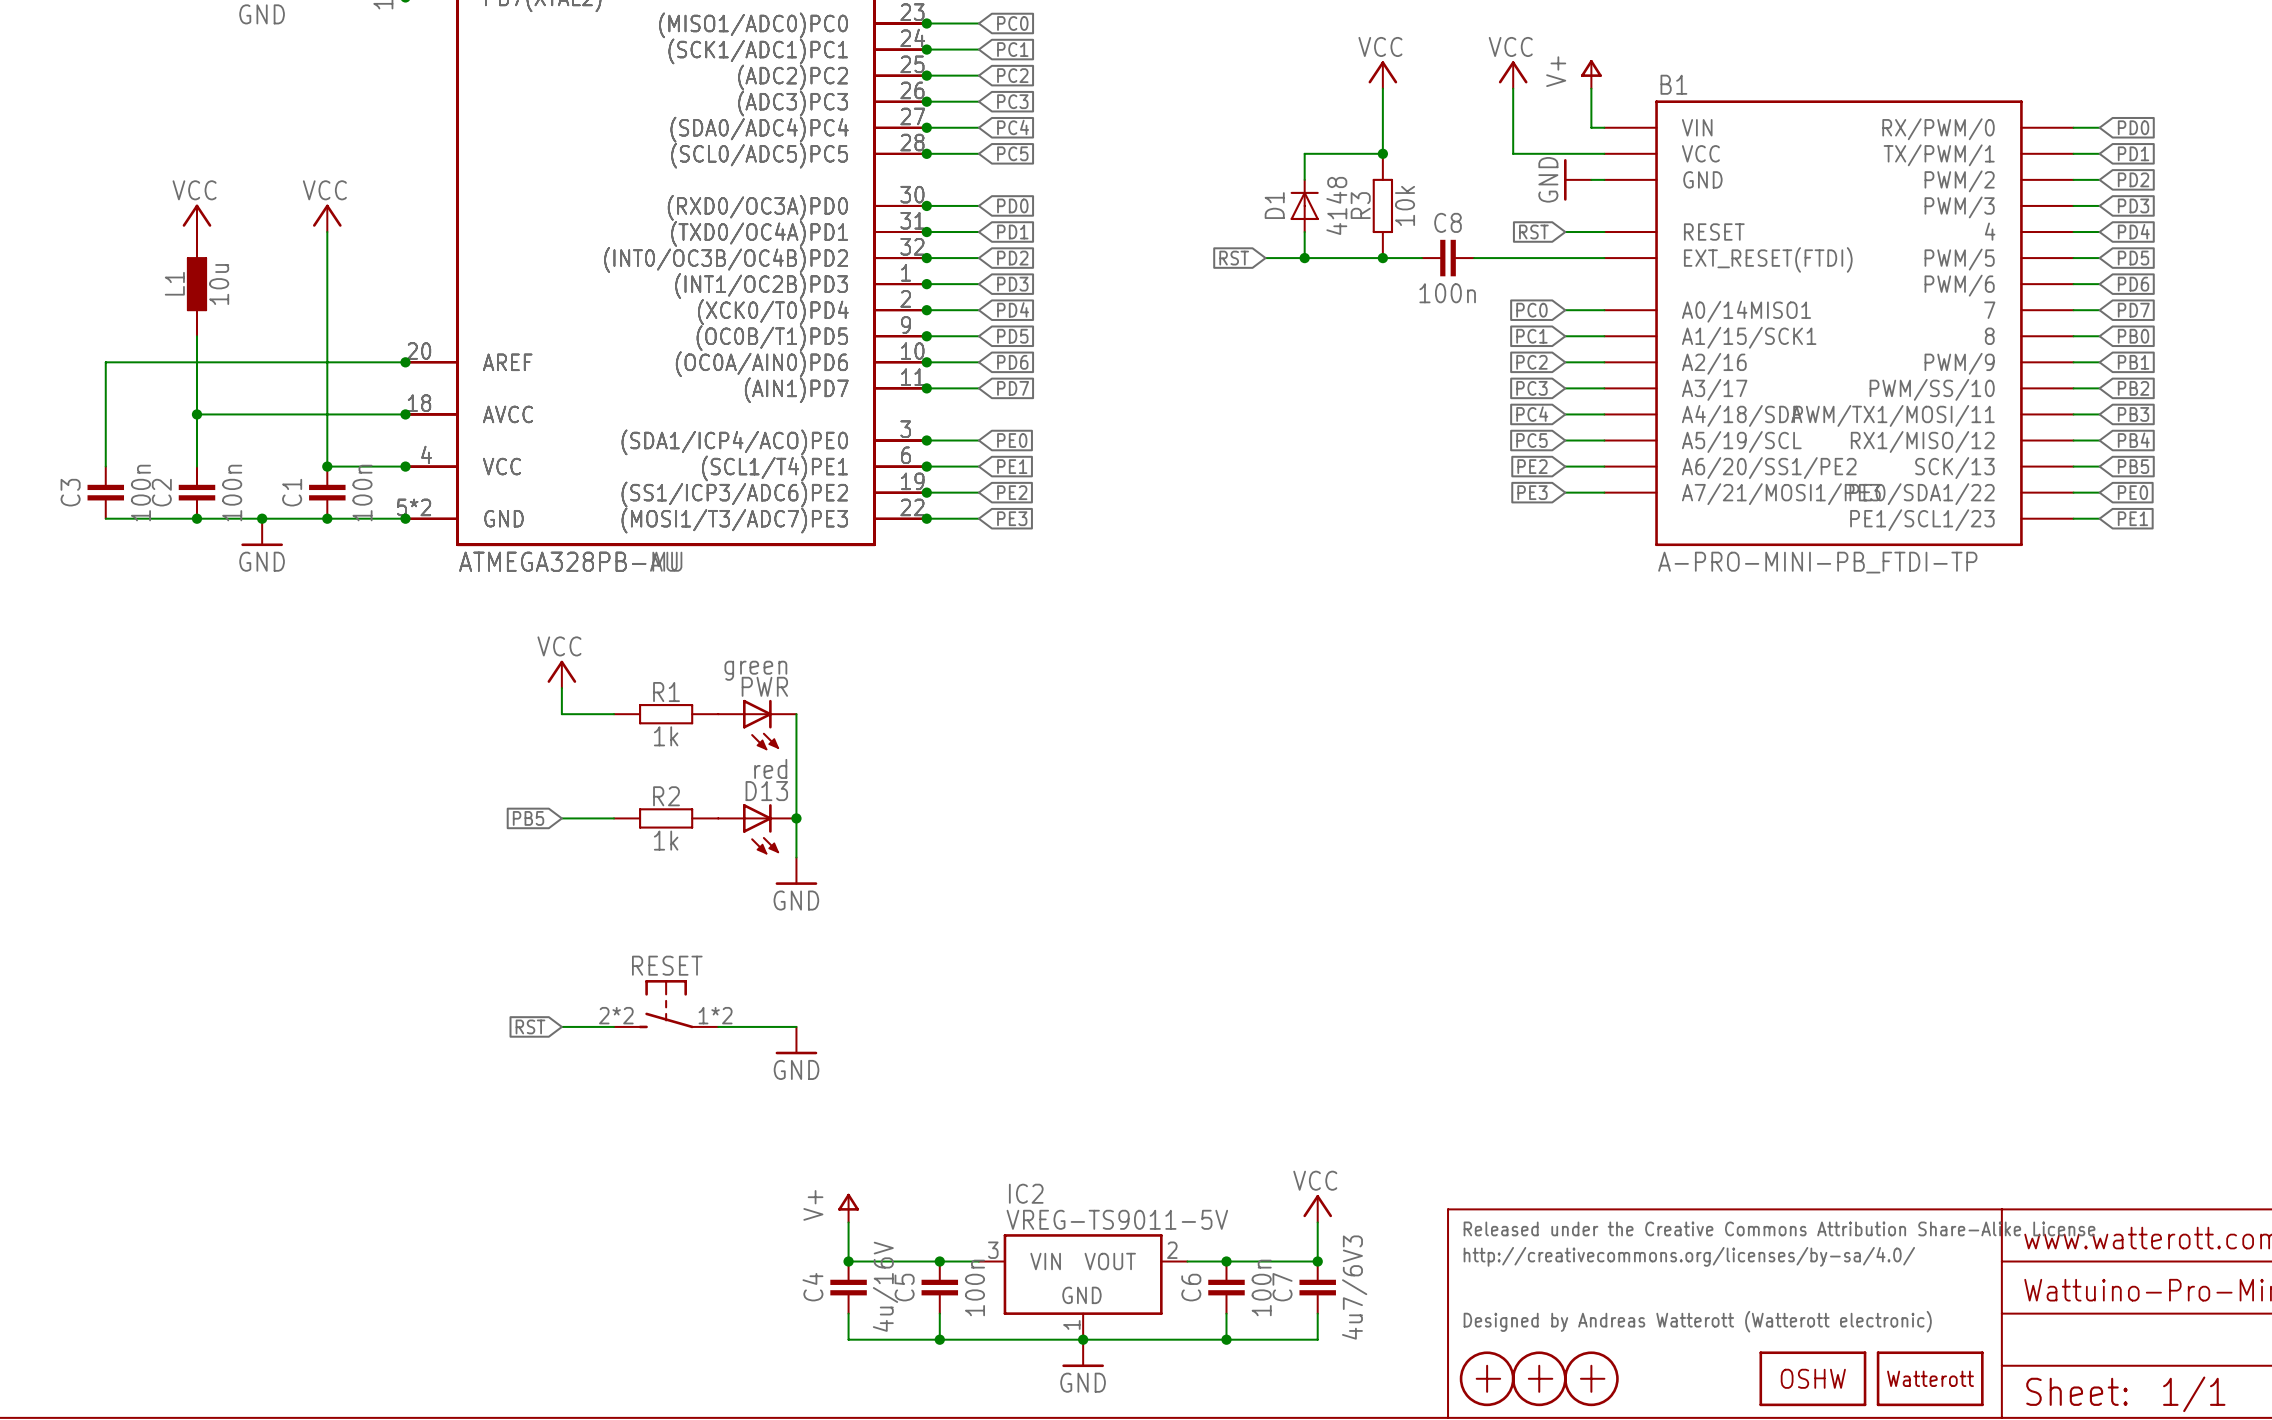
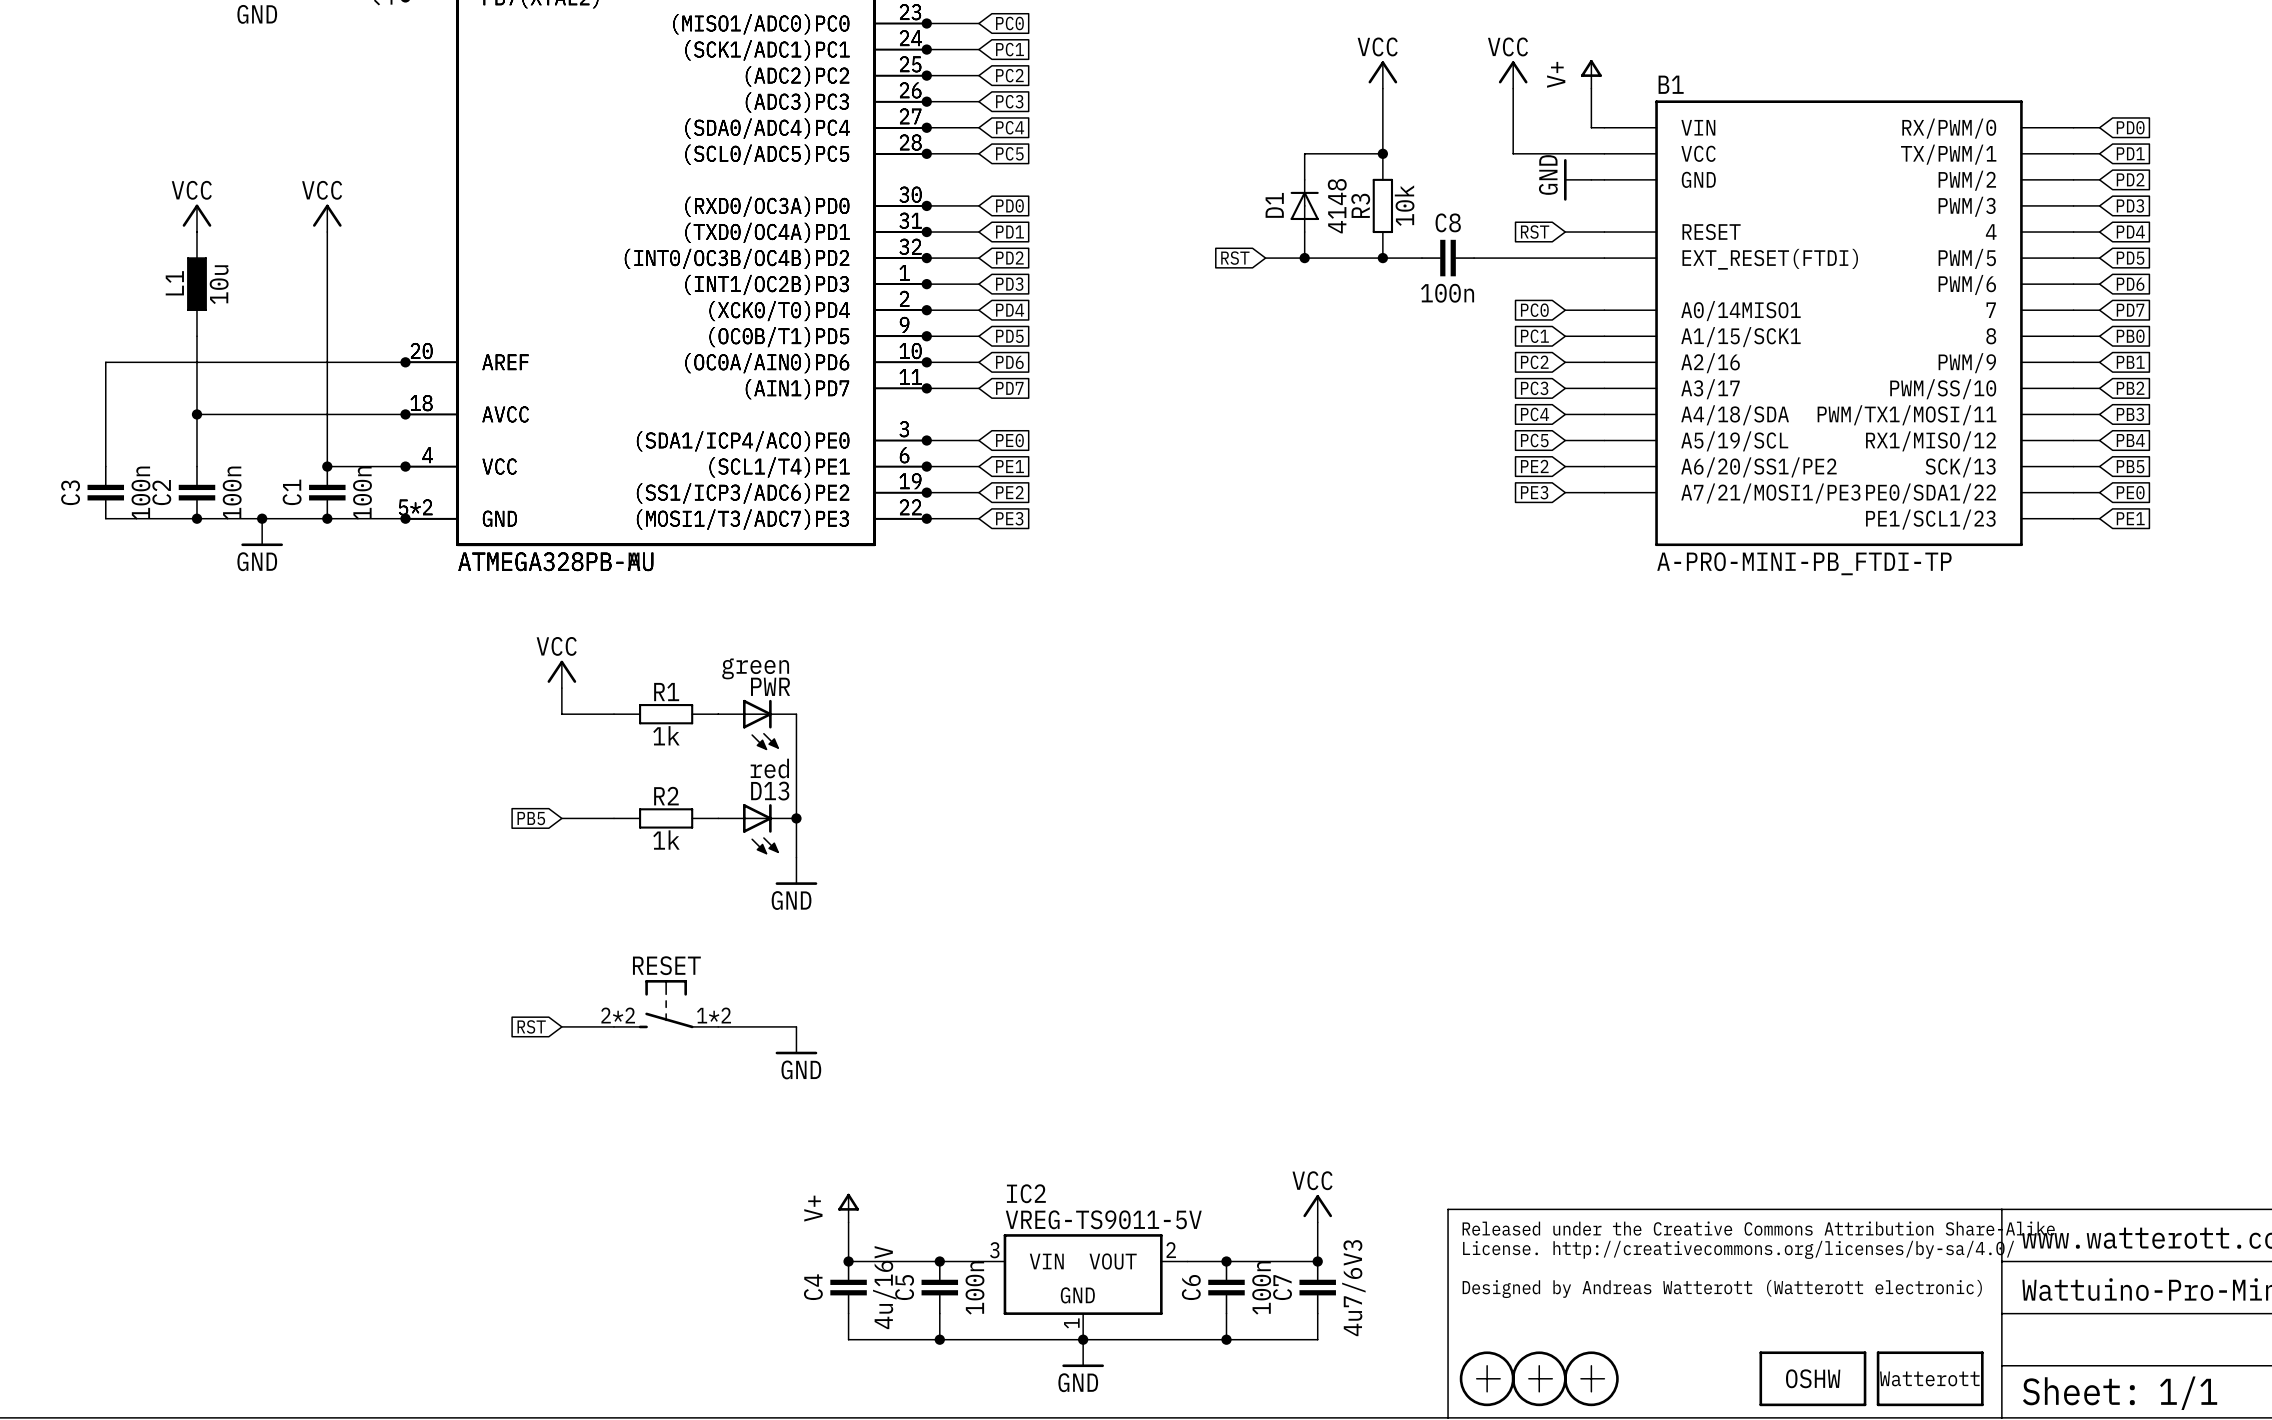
text: Released under the Creative Commons Attribution Share-Alike License (1779, 1228) -> License. http://creativecommons.org/licenses/by-sa/4.0/ (1738, 1249)
text: http://creativecommons.org/licenses/by-sa/4.0/ (1689, 1256) -> none
text position: Designed by Andreas Watterott (Watterott electronic) (1697, 1321) -> Designed by Andreas Watterott (Watterott electronic) (1722, 1288)

